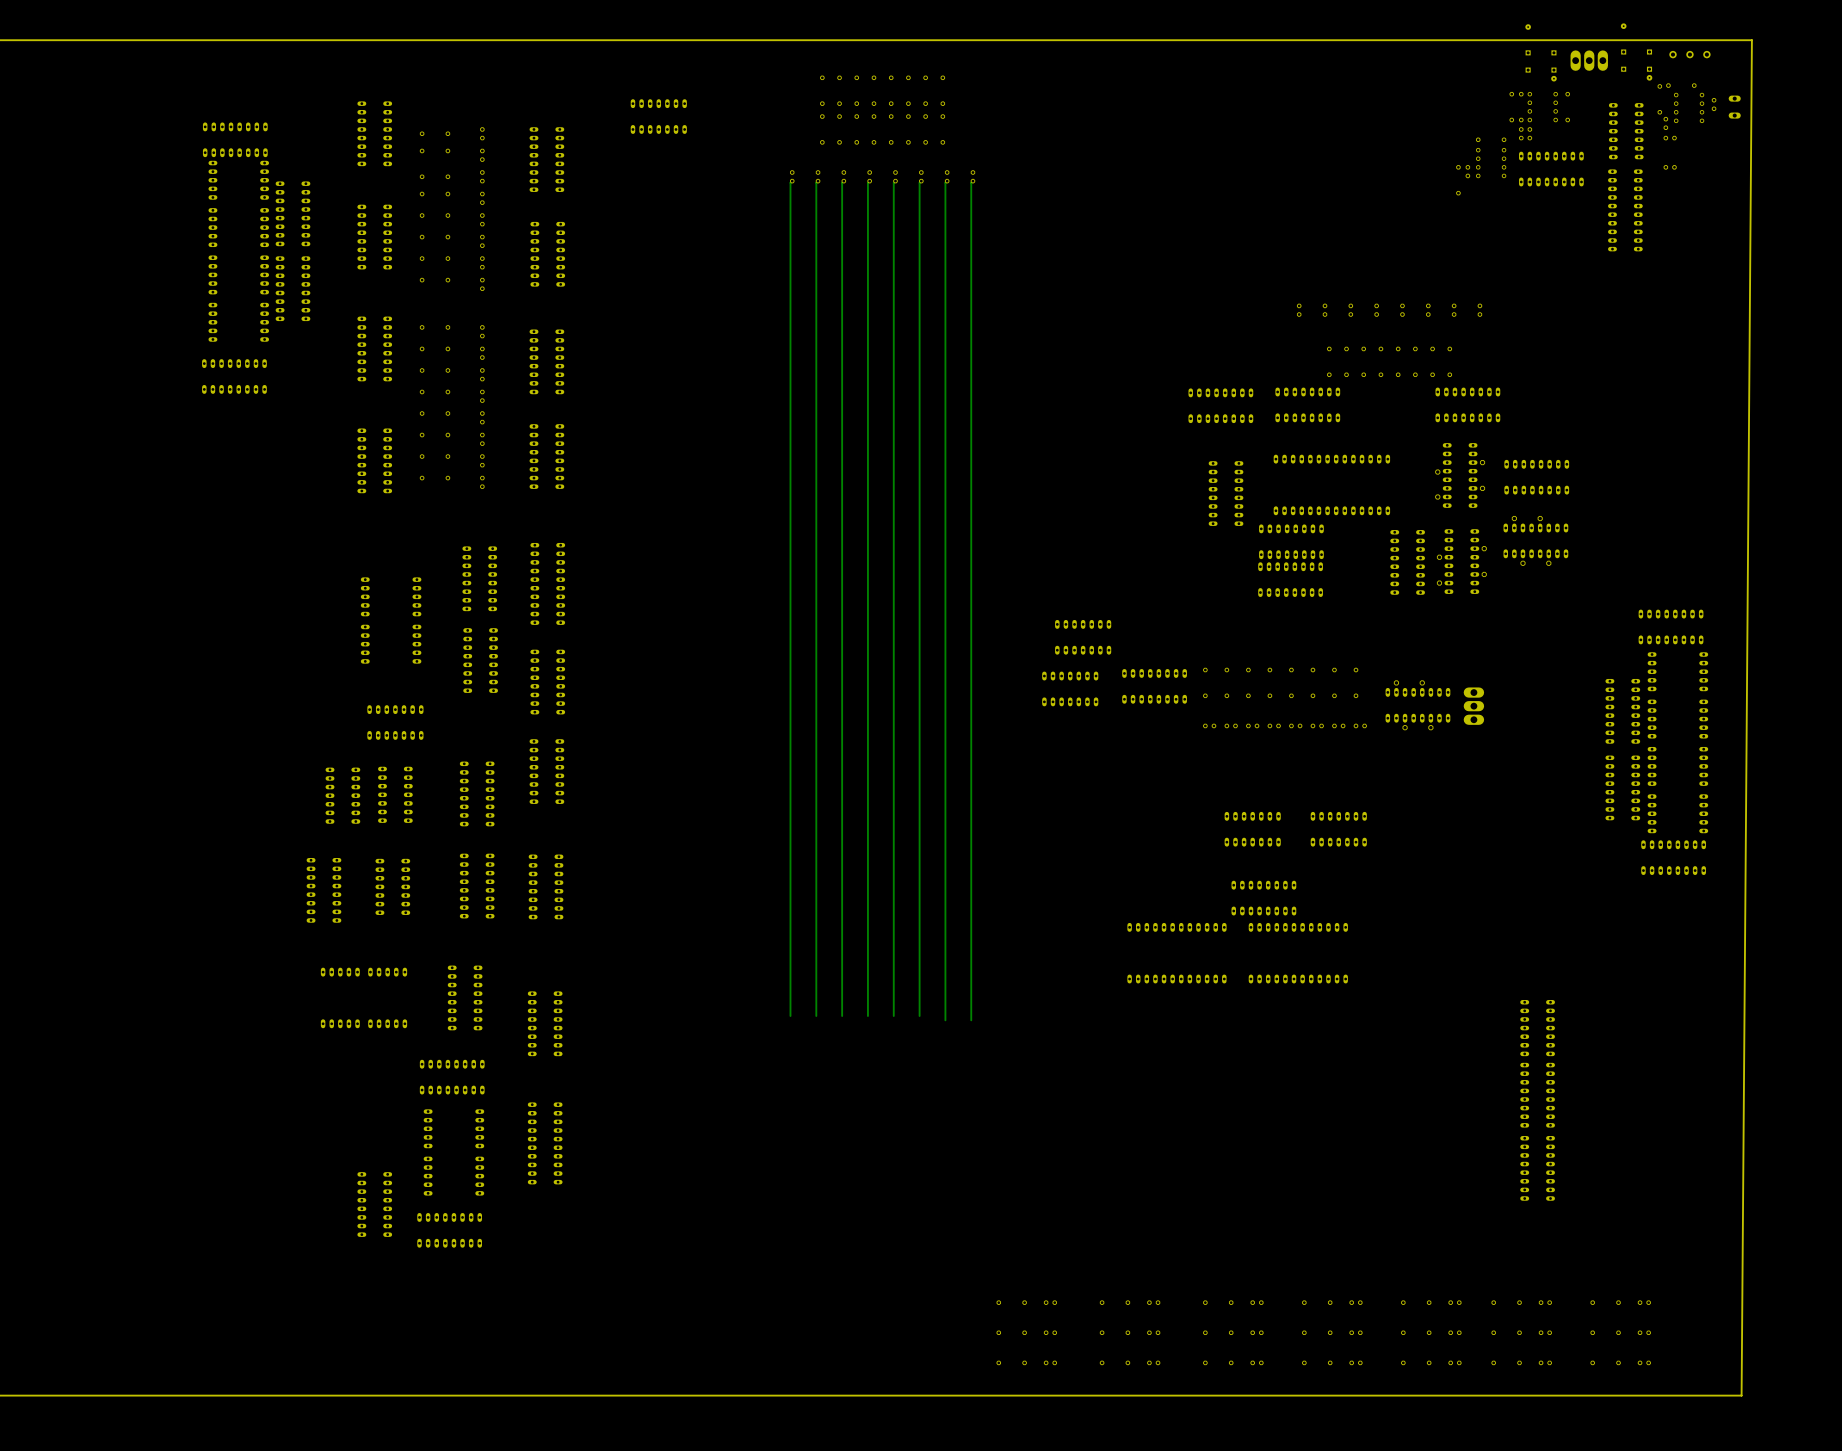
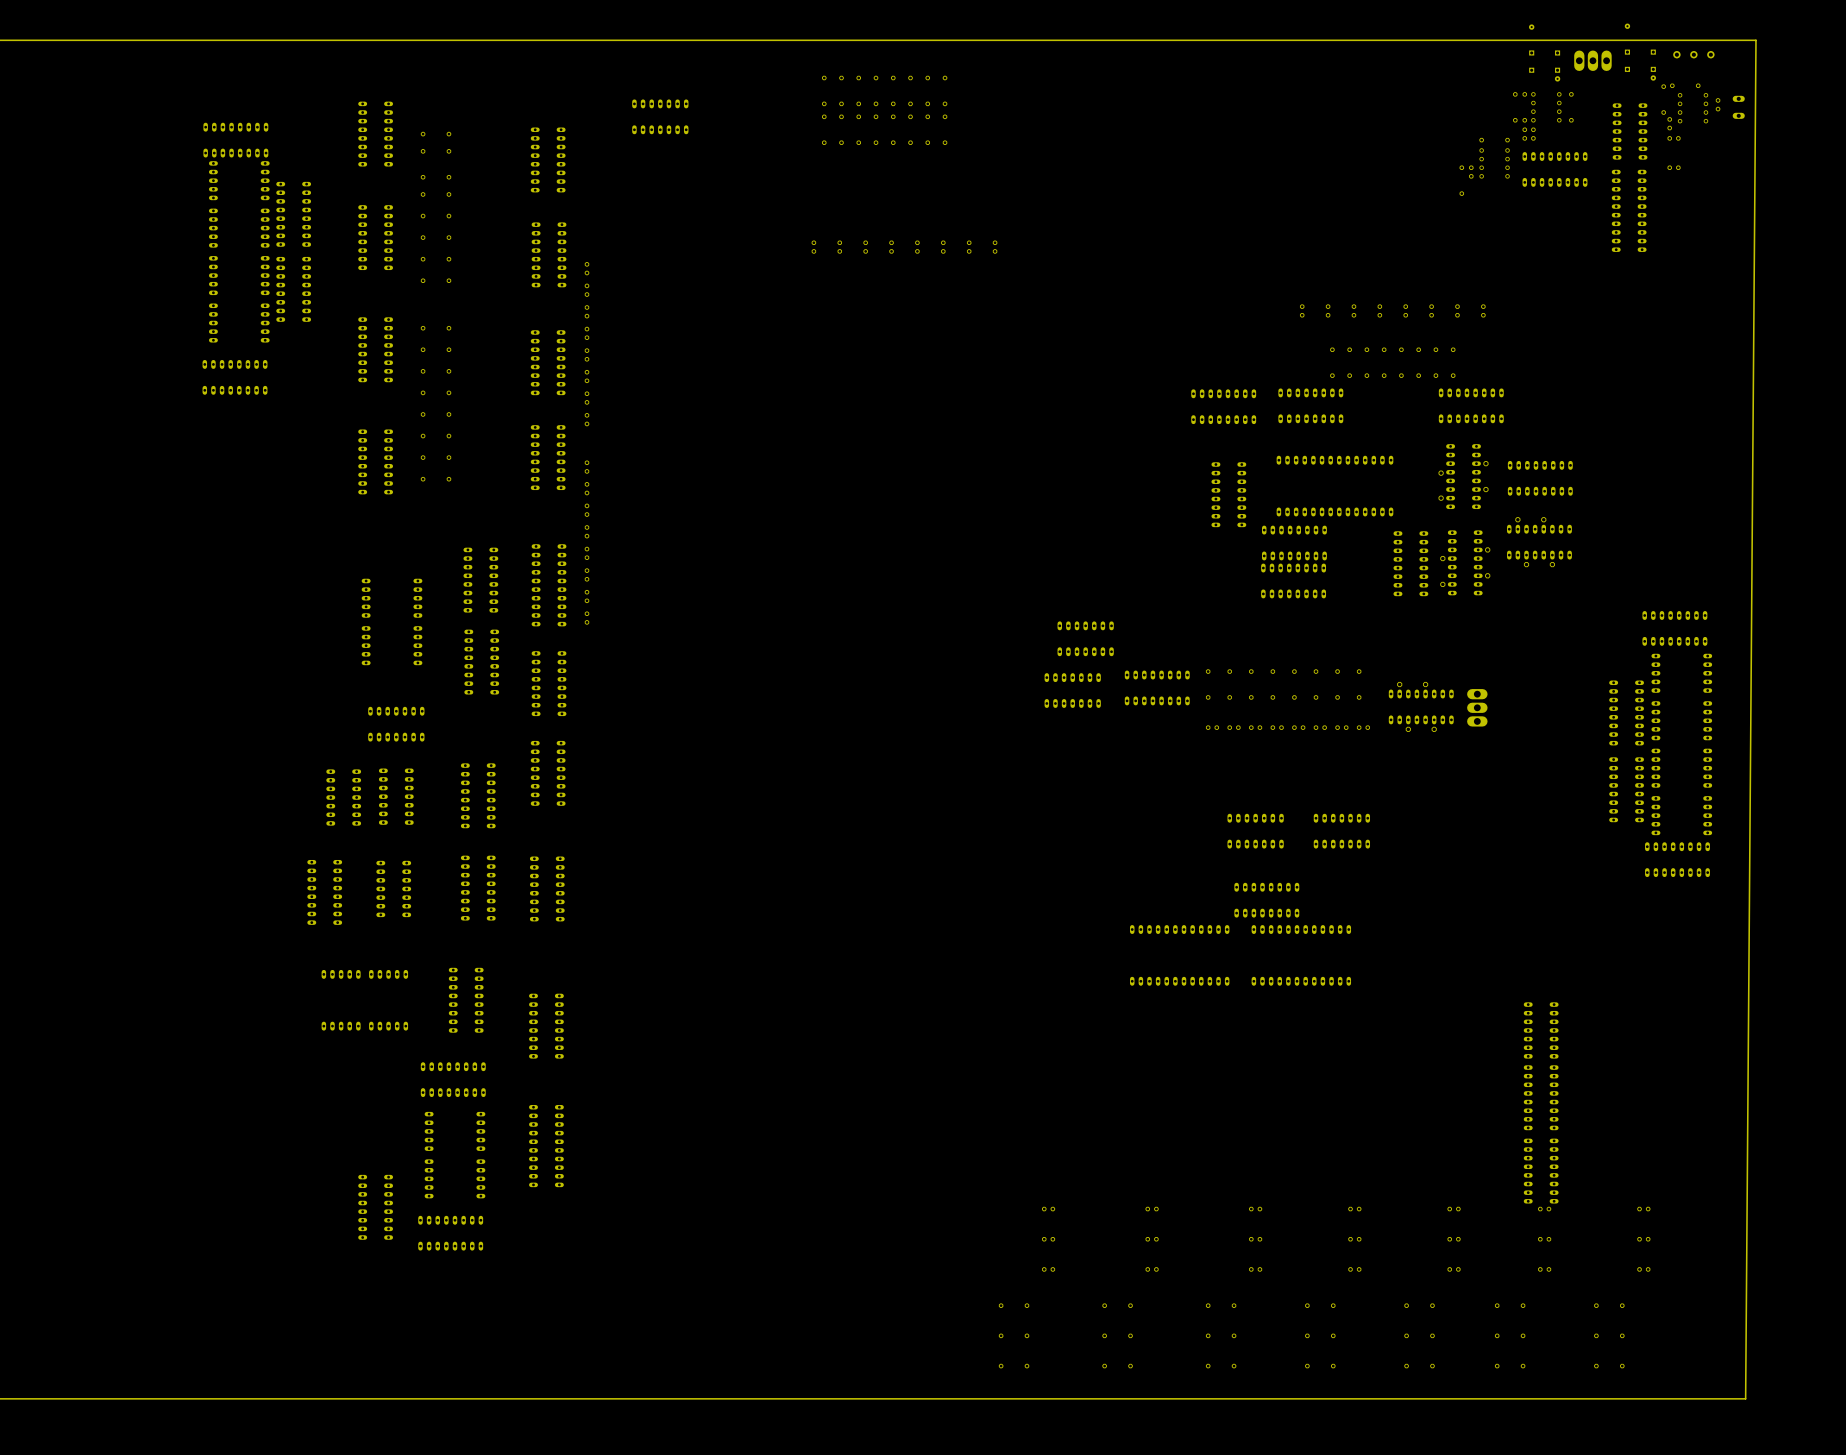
part: (482, 133) -> none
part: (482, 155) -> none
part: (482, 176) -> none
part: (792, 176) -> none
part: (818, 176) -> none
part: (843, 176) -> none
part: (869, 176) -> none
part: (895, 176) -> none
part: (921, 176) -> none
part: (947, 176) -> none
part: (972, 176) -> none
track: (792, 181) (790, 182) (790, 1016) -> none
track: (818, 181) (816, 182) (816, 1016) -> none
track: (843, 181) (842, 182) (842, 1016) -> none
track: (869, 181) (867, 182) (867, 1016) -> none
track: (895, 181) (893, 182) (893, 1016) -> none
track: (921, 181) (919, 182) (919, 1016) -> none
track: (947, 181) (945, 182) (945, 1020) -> none
track: (972, 181) (971, 182) (971, 1020) -> none
part: (482, 198) -> none
part: (482, 219) -> none
part: (482, 241) -> none
part: none -> (813, 247)
part: none -> (839, 247)
part: none -> (865, 247)
part: none -> (891, 247)
part: none -> (917, 247)
part: none -> (943, 247)
part: none -> (969, 247)
part: none -> (995, 247)
part: (482, 262) -> none
part: none -> (586, 268)
part: (482, 284) -> none
part: none -> (586, 290)
part: none -> (586, 311)
part: (482, 331) -> none
part: none -> (586, 333)
part: (482, 353) -> none
part: none -> (586, 354)
part: (482, 374) -> none
part: none -> (586, 376)
part: (482, 396) -> none
part: none -> (586, 398)
part: (482, 417) -> none
part: none -> (586, 419)
part: (482, 439) -> none
part: (482, 460) -> none
part: none -> (586, 467)
part: (482, 482) -> none
part: none -> (586, 488)
part: none -> (586, 510)
part: none -> (586, 531)
part: none -> (586, 553)
part: none -> (586, 574)
part: none -> (586, 596)
part: none -> (586, 618)
part: none -> (1048, 1209)
part: none -> (1152, 1209)
part: none -> (1255, 1209)
part: none -> (1354, 1209)
part: none -> (1454, 1209)
part: none -> (1544, 1209)
part: none -> (1643, 1209)
part: none -> (1048, 1239)
part: none -> (1152, 1239)
part: none -> (1255, 1239)
part: none -> (1354, 1239)
part: none -> (1454, 1239)
part: none -> (1544, 1239)
part: none -> (1643, 1239)
part: none -> (1048, 1269)
part: none -> (1152, 1269)
part: none -> (1255, 1269)
part: none -> (1354, 1269)
part: none -> (1454, 1269)
part: none -> (1544, 1269)
part: none -> (1643, 1269)
part: (1050, 1302) -> none
part: (1153, 1302) -> none
part: (1257, 1302) -> none
part: (1355, 1302) -> none
part: (1454, 1302) -> none
part: (1545, 1302) -> none
part: (1644, 1302) -> none
part: (1050, 1332) -> none
part: (1153, 1332) -> none
part: (1257, 1332) -> none
part: (1355, 1332) -> none
part: (1454, 1332) -> none
part: (1545, 1332) -> none
part: (1644, 1332) -> none
part: (1050, 1362) -> none
part: (1153, 1362) -> none
part: (1257, 1362) -> none
part: (1355, 1362) -> none
part: (1454, 1362) -> none
part: (1545, 1362) -> none
part: (1644, 1362) -> none

